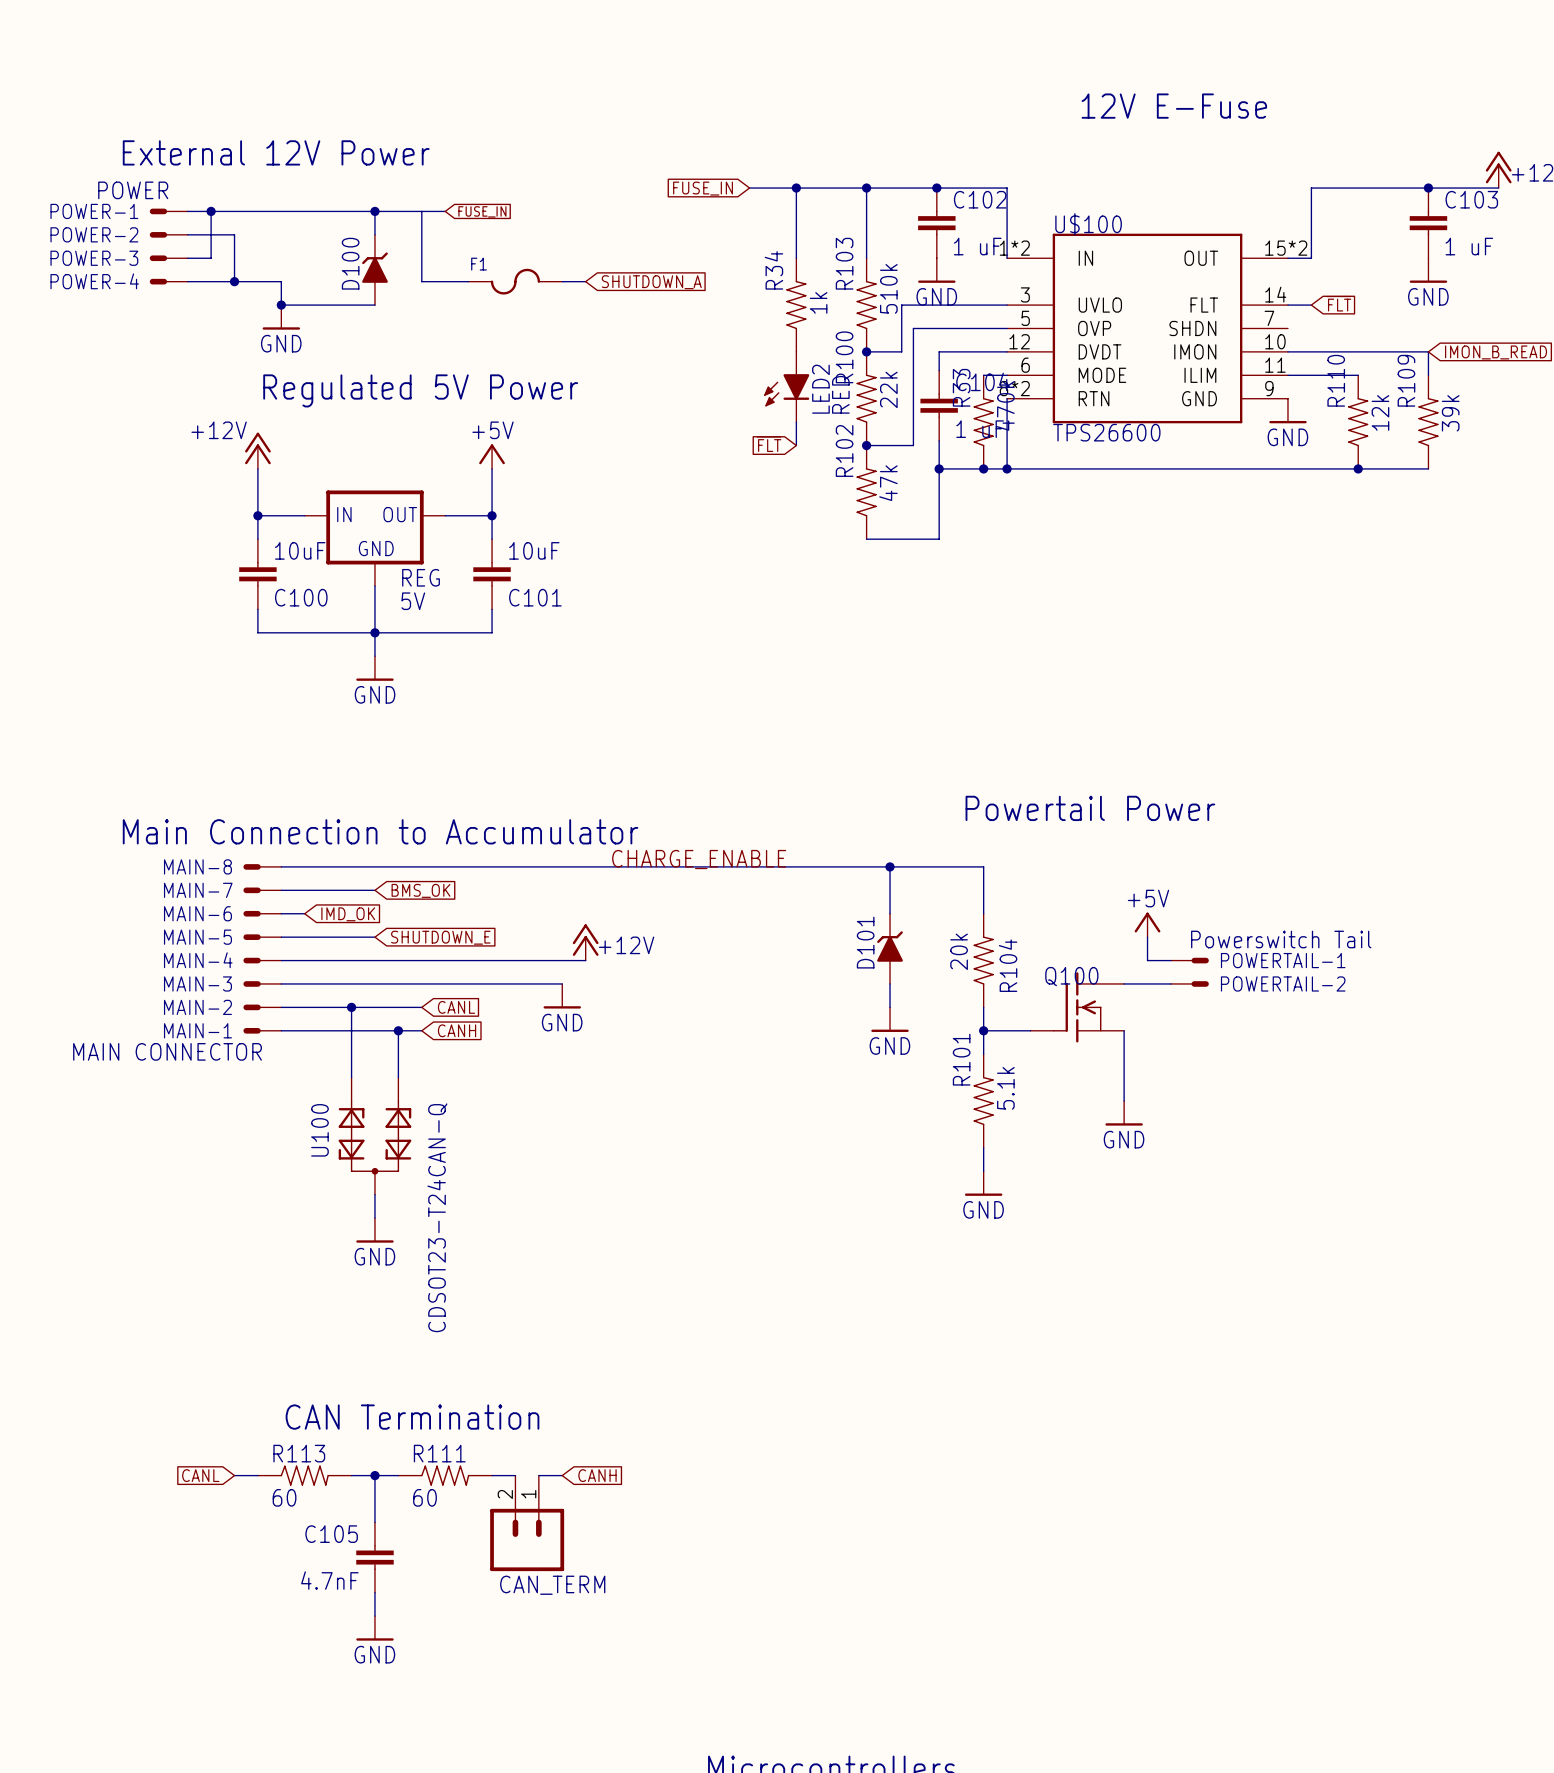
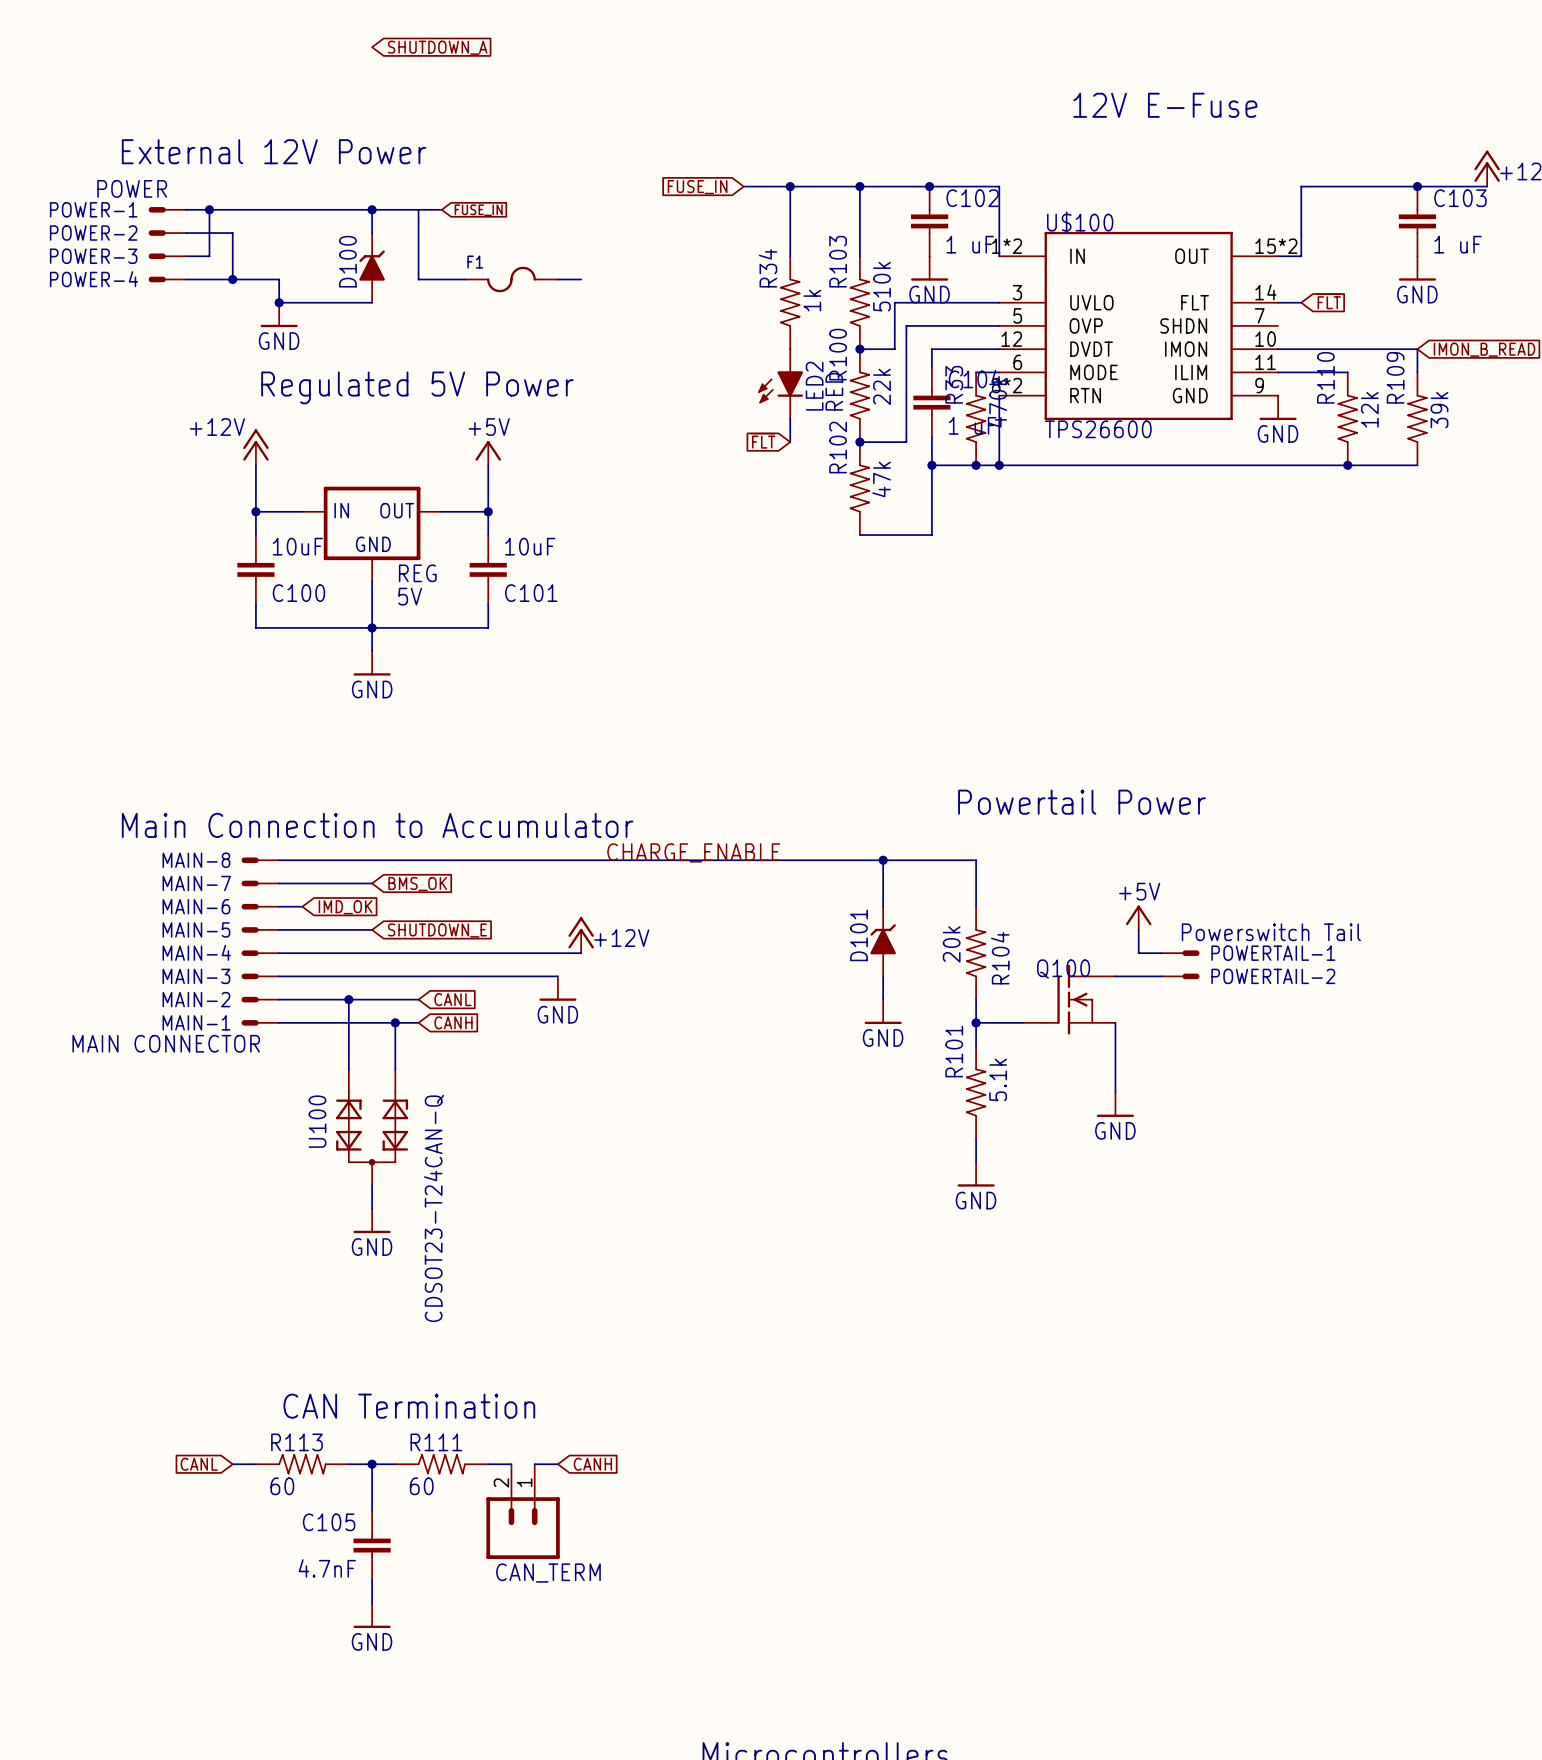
global label: none -> SHUTDOWN_A (437, 47)
global label: SHUTDOWN_A (651, 282) -> none

